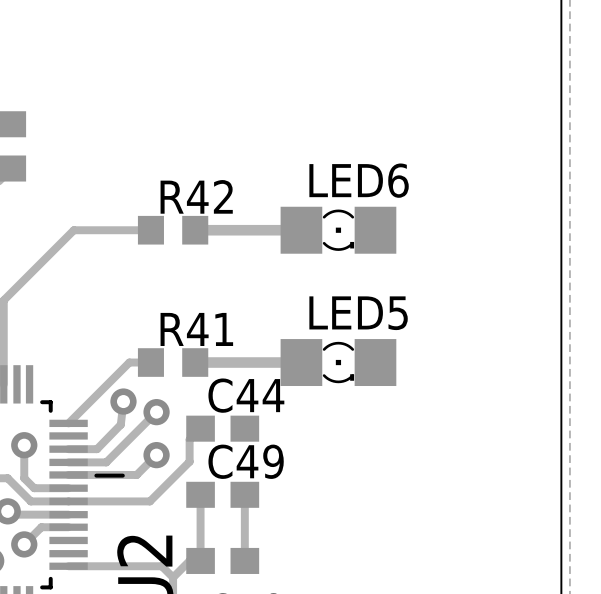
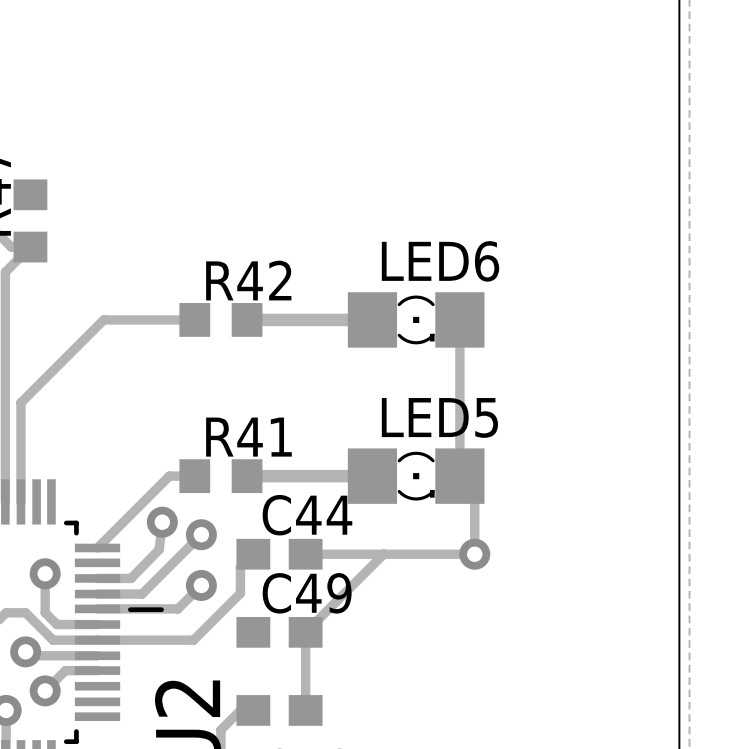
track: none -> (459, 319) (459, 476) (474, 490) (474, 554) (305, 554)
track: none -> (383, 554) (305, 632)
via: none -> (474, 554)
track: (200, 494) (200, 560) -> none
track: (68, 566) (161, 566) (173, 577) -> none

